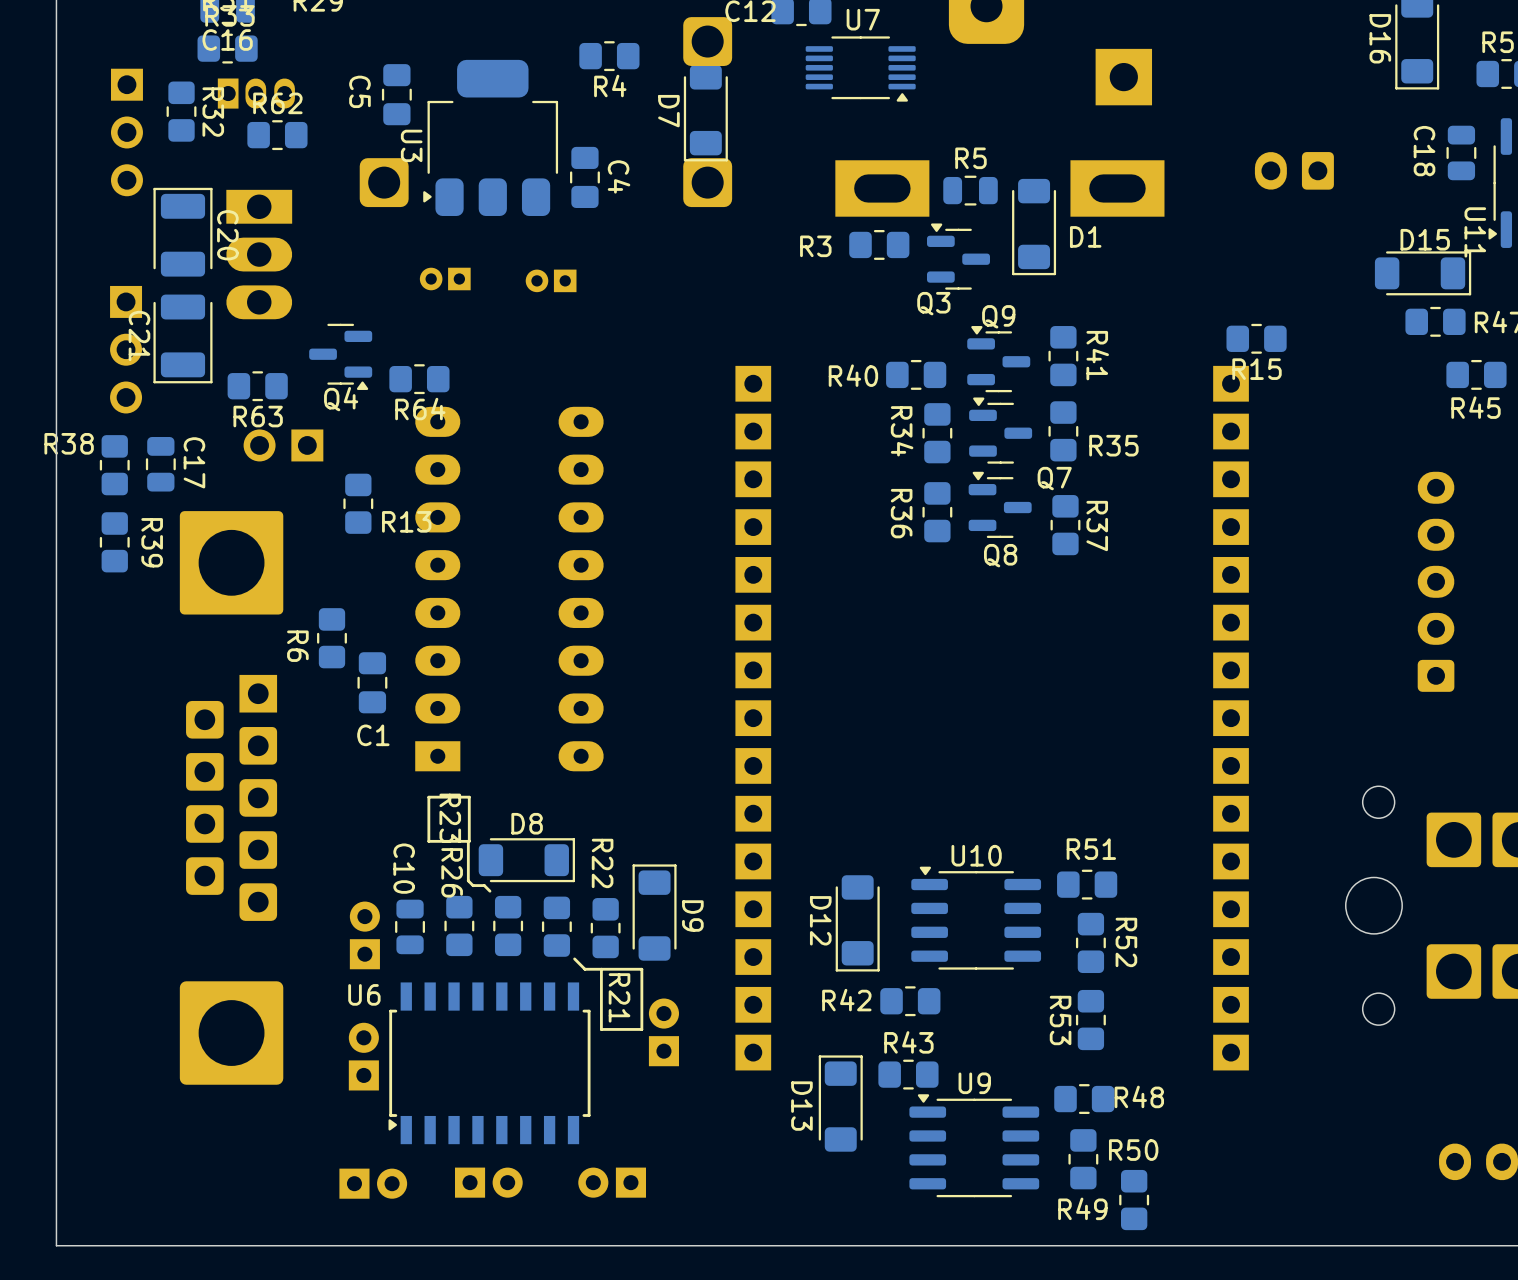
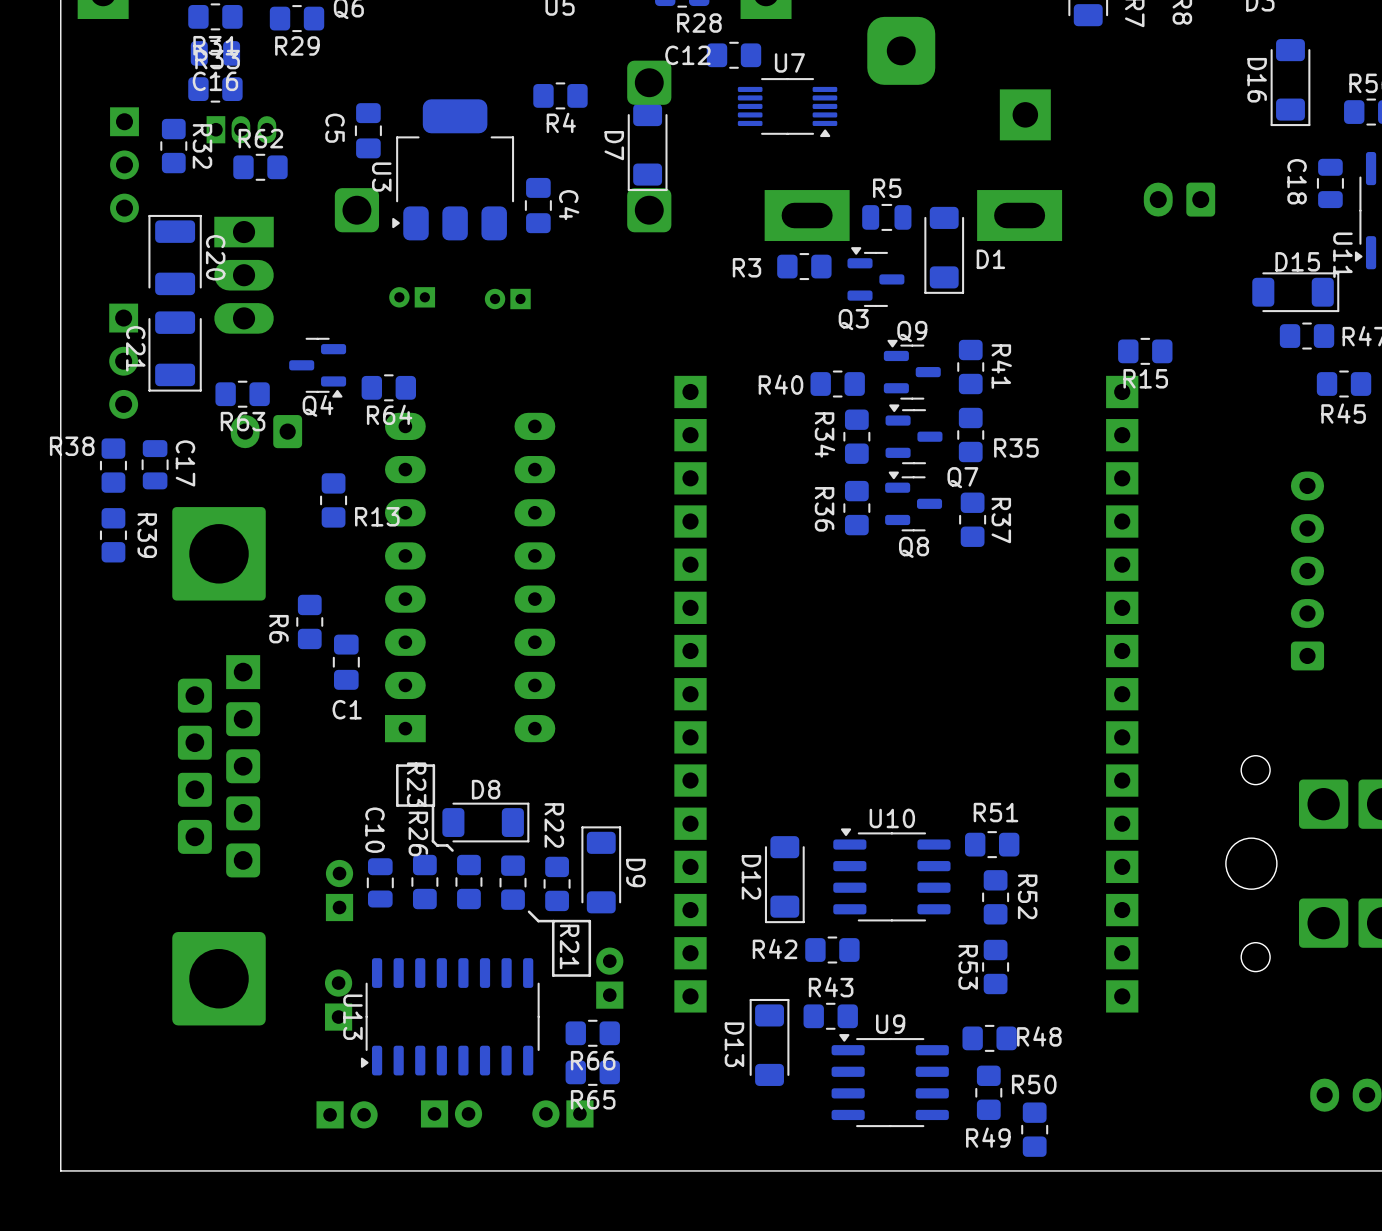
part footprint: [243, 429, 324, 462] -> [230, 415, 303, 449]
U6: (489, 1063) -> none
U13: none -> (450, 1016)
R66: none -> (592, 1033)
R65: none -> (592, 1072)

